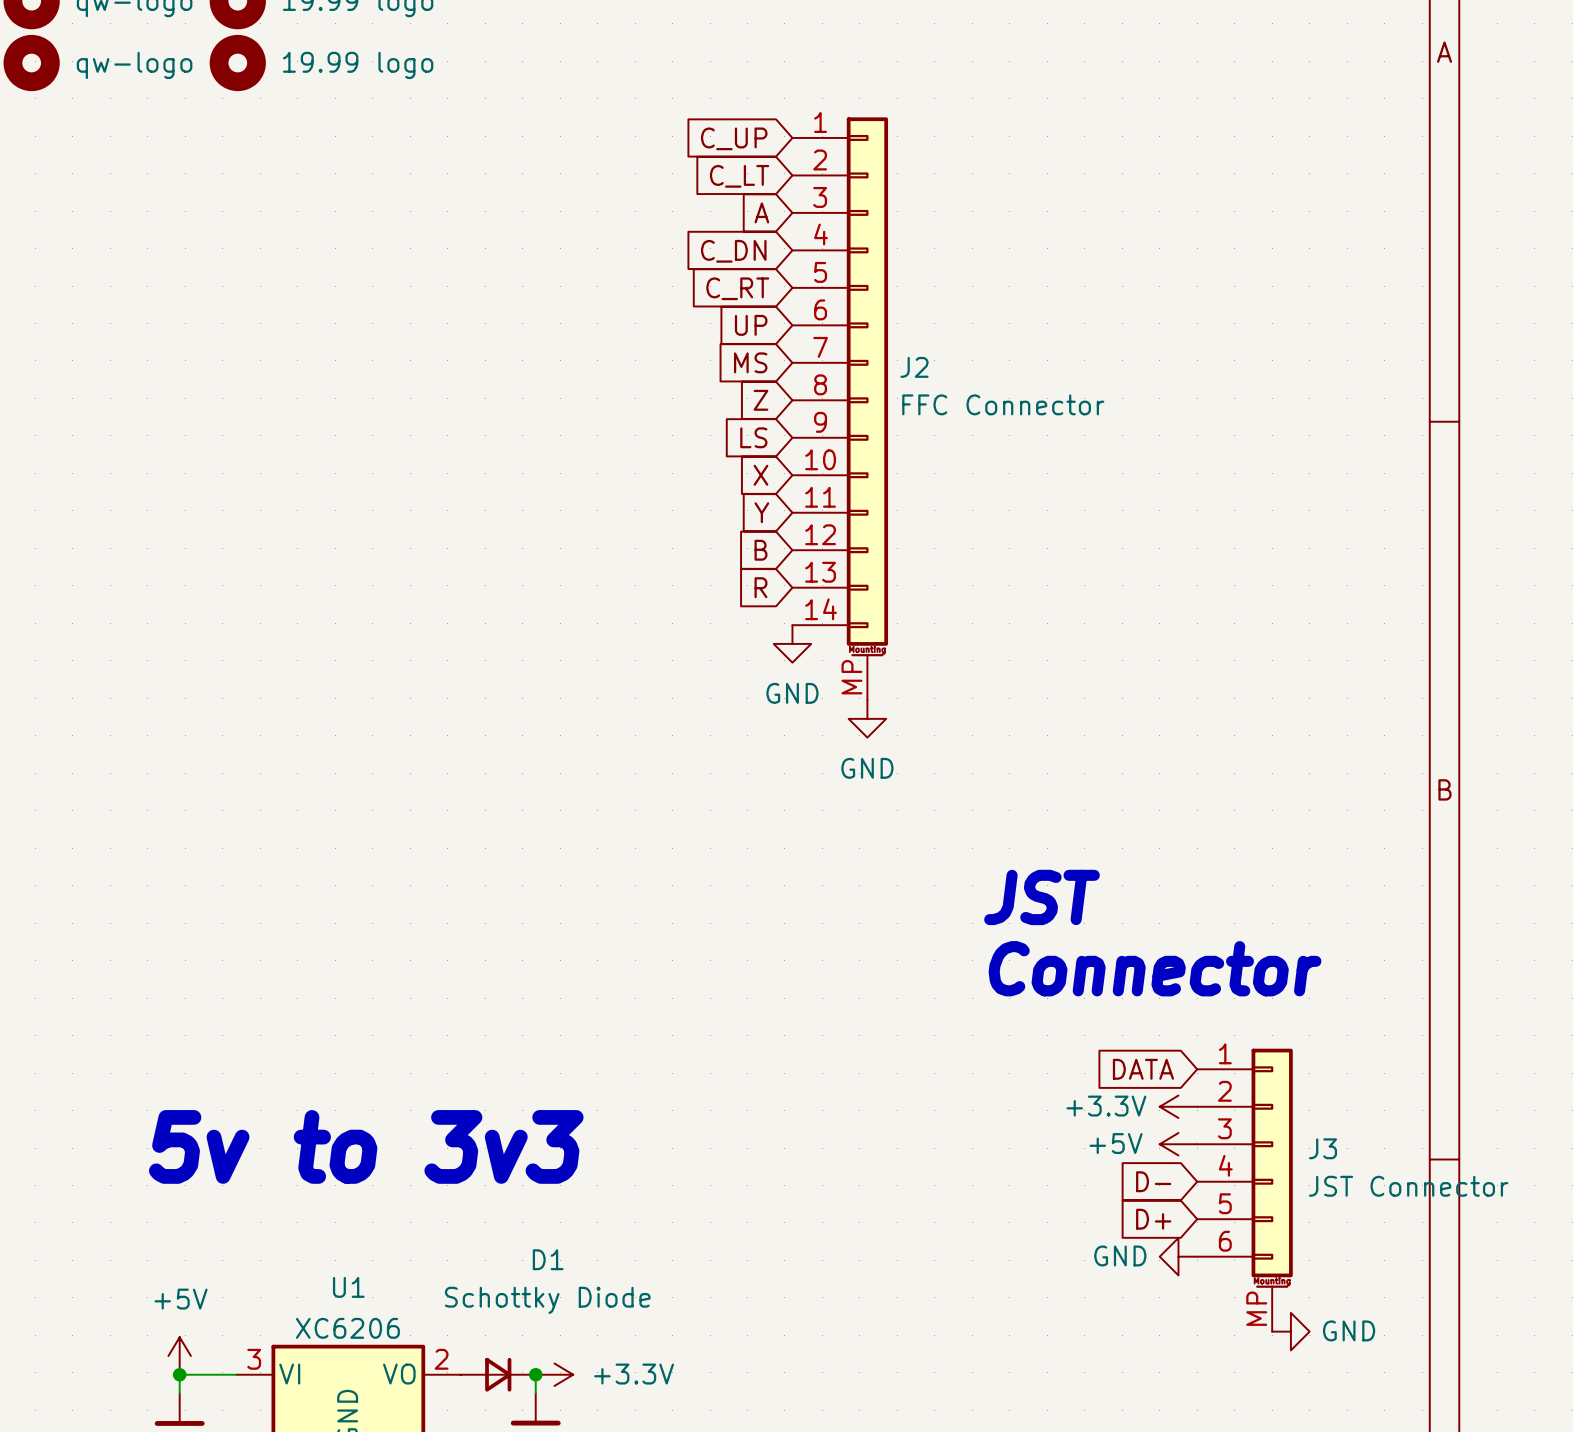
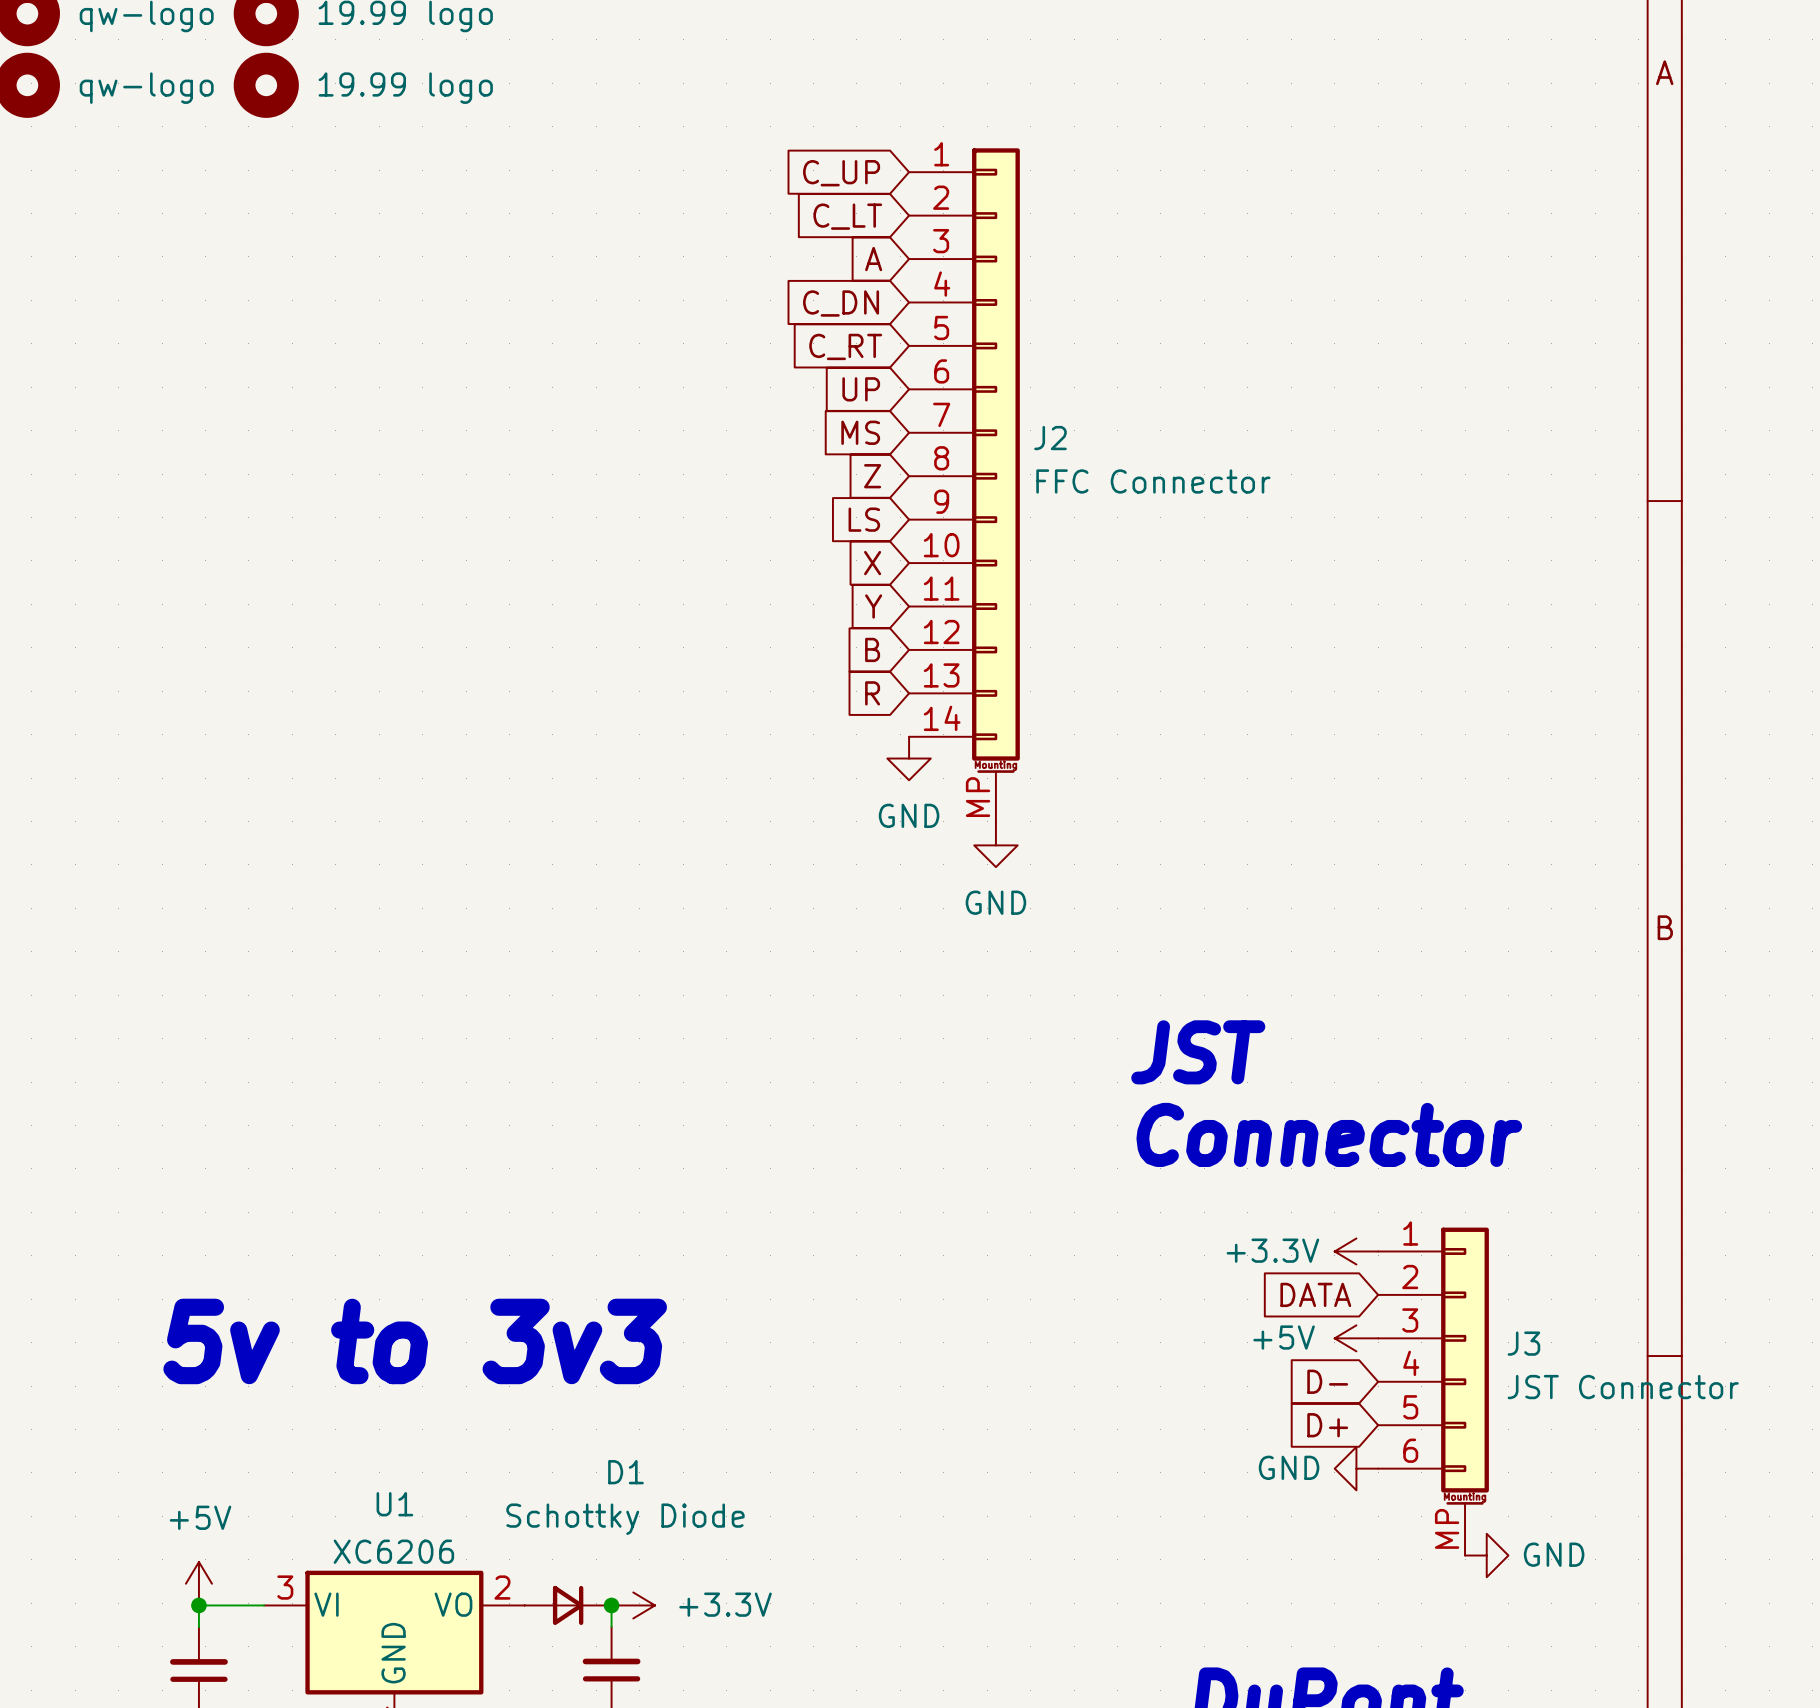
global label position: DATA (1143, 1069) -> DATA (1315, 1294)
power symbol position: +3.3V (1178, 1106) -> +3.3V (1356, 1251)

